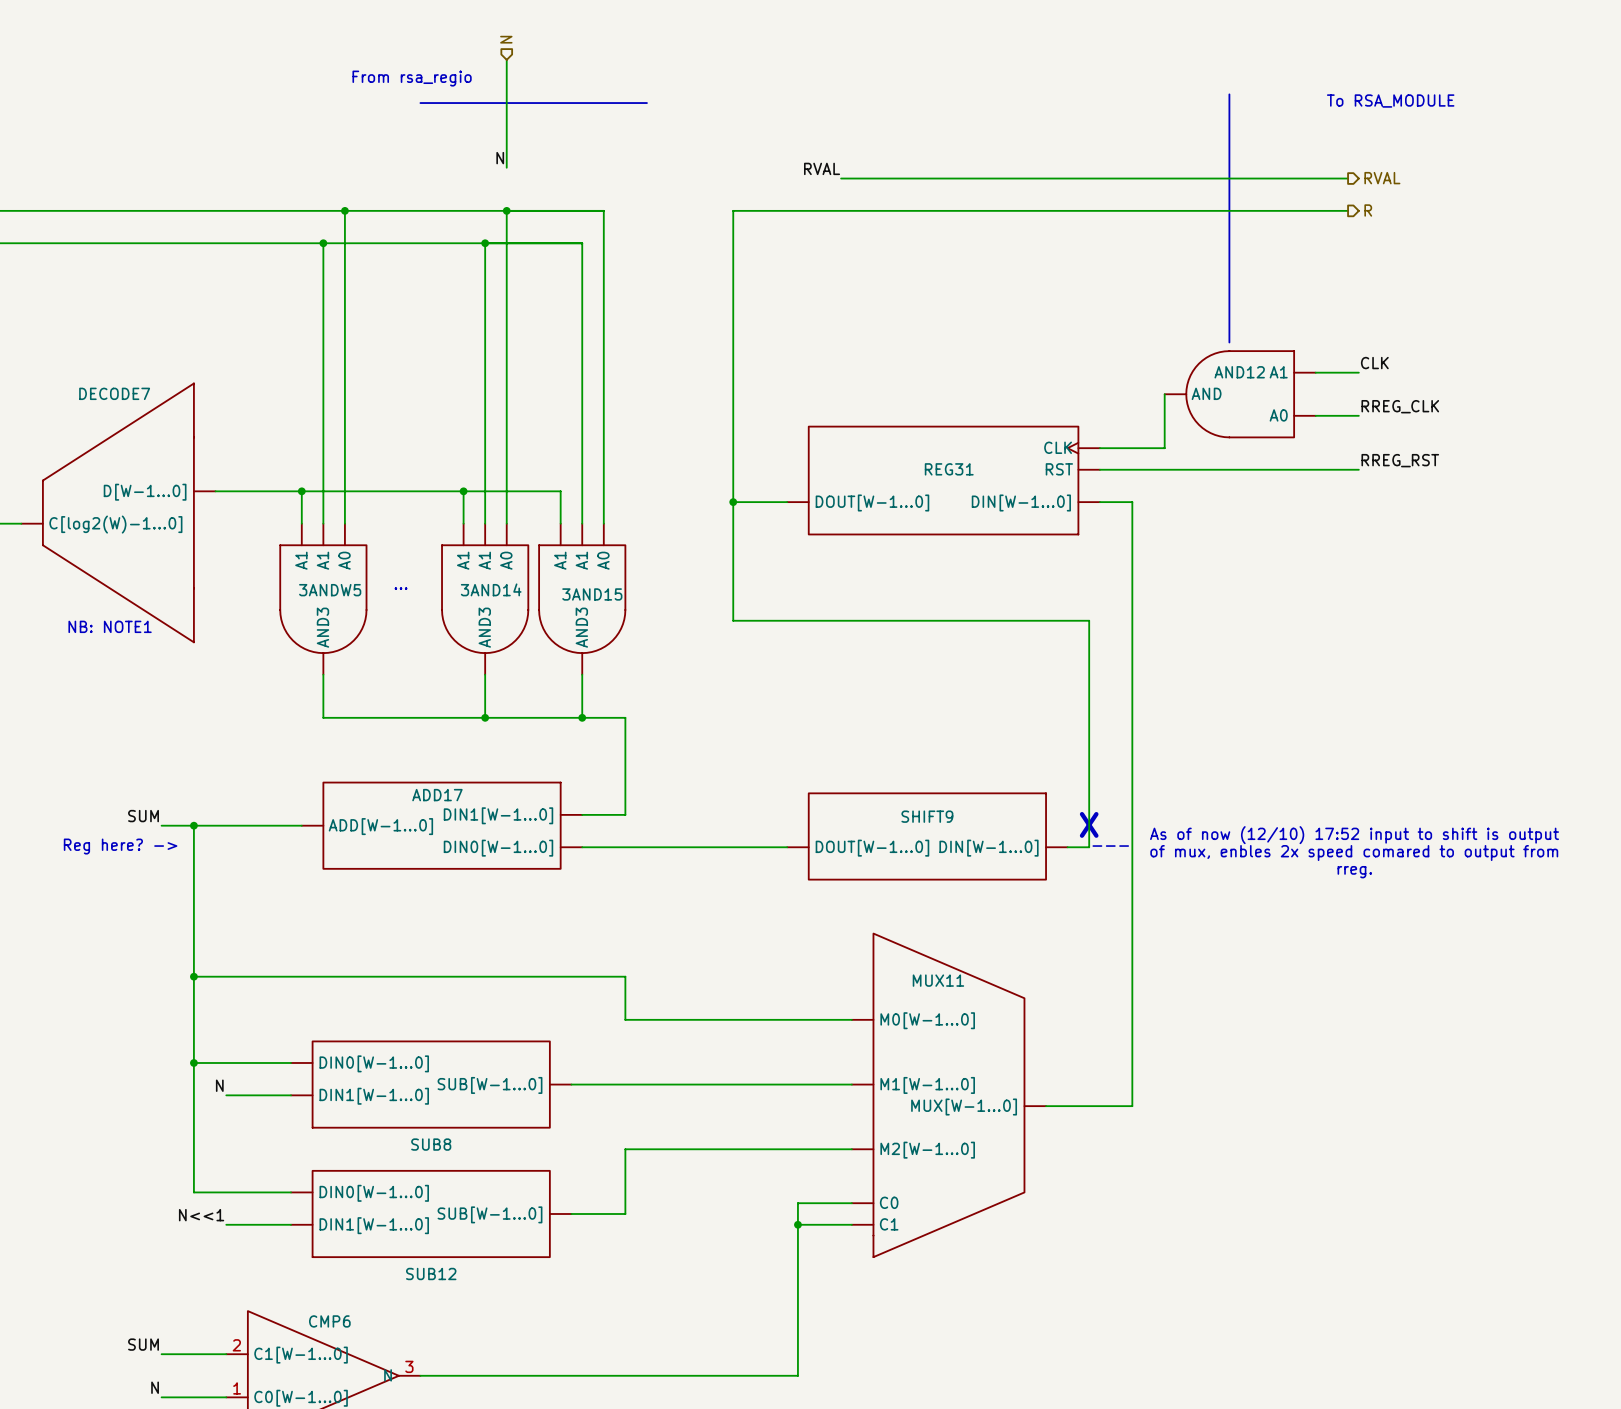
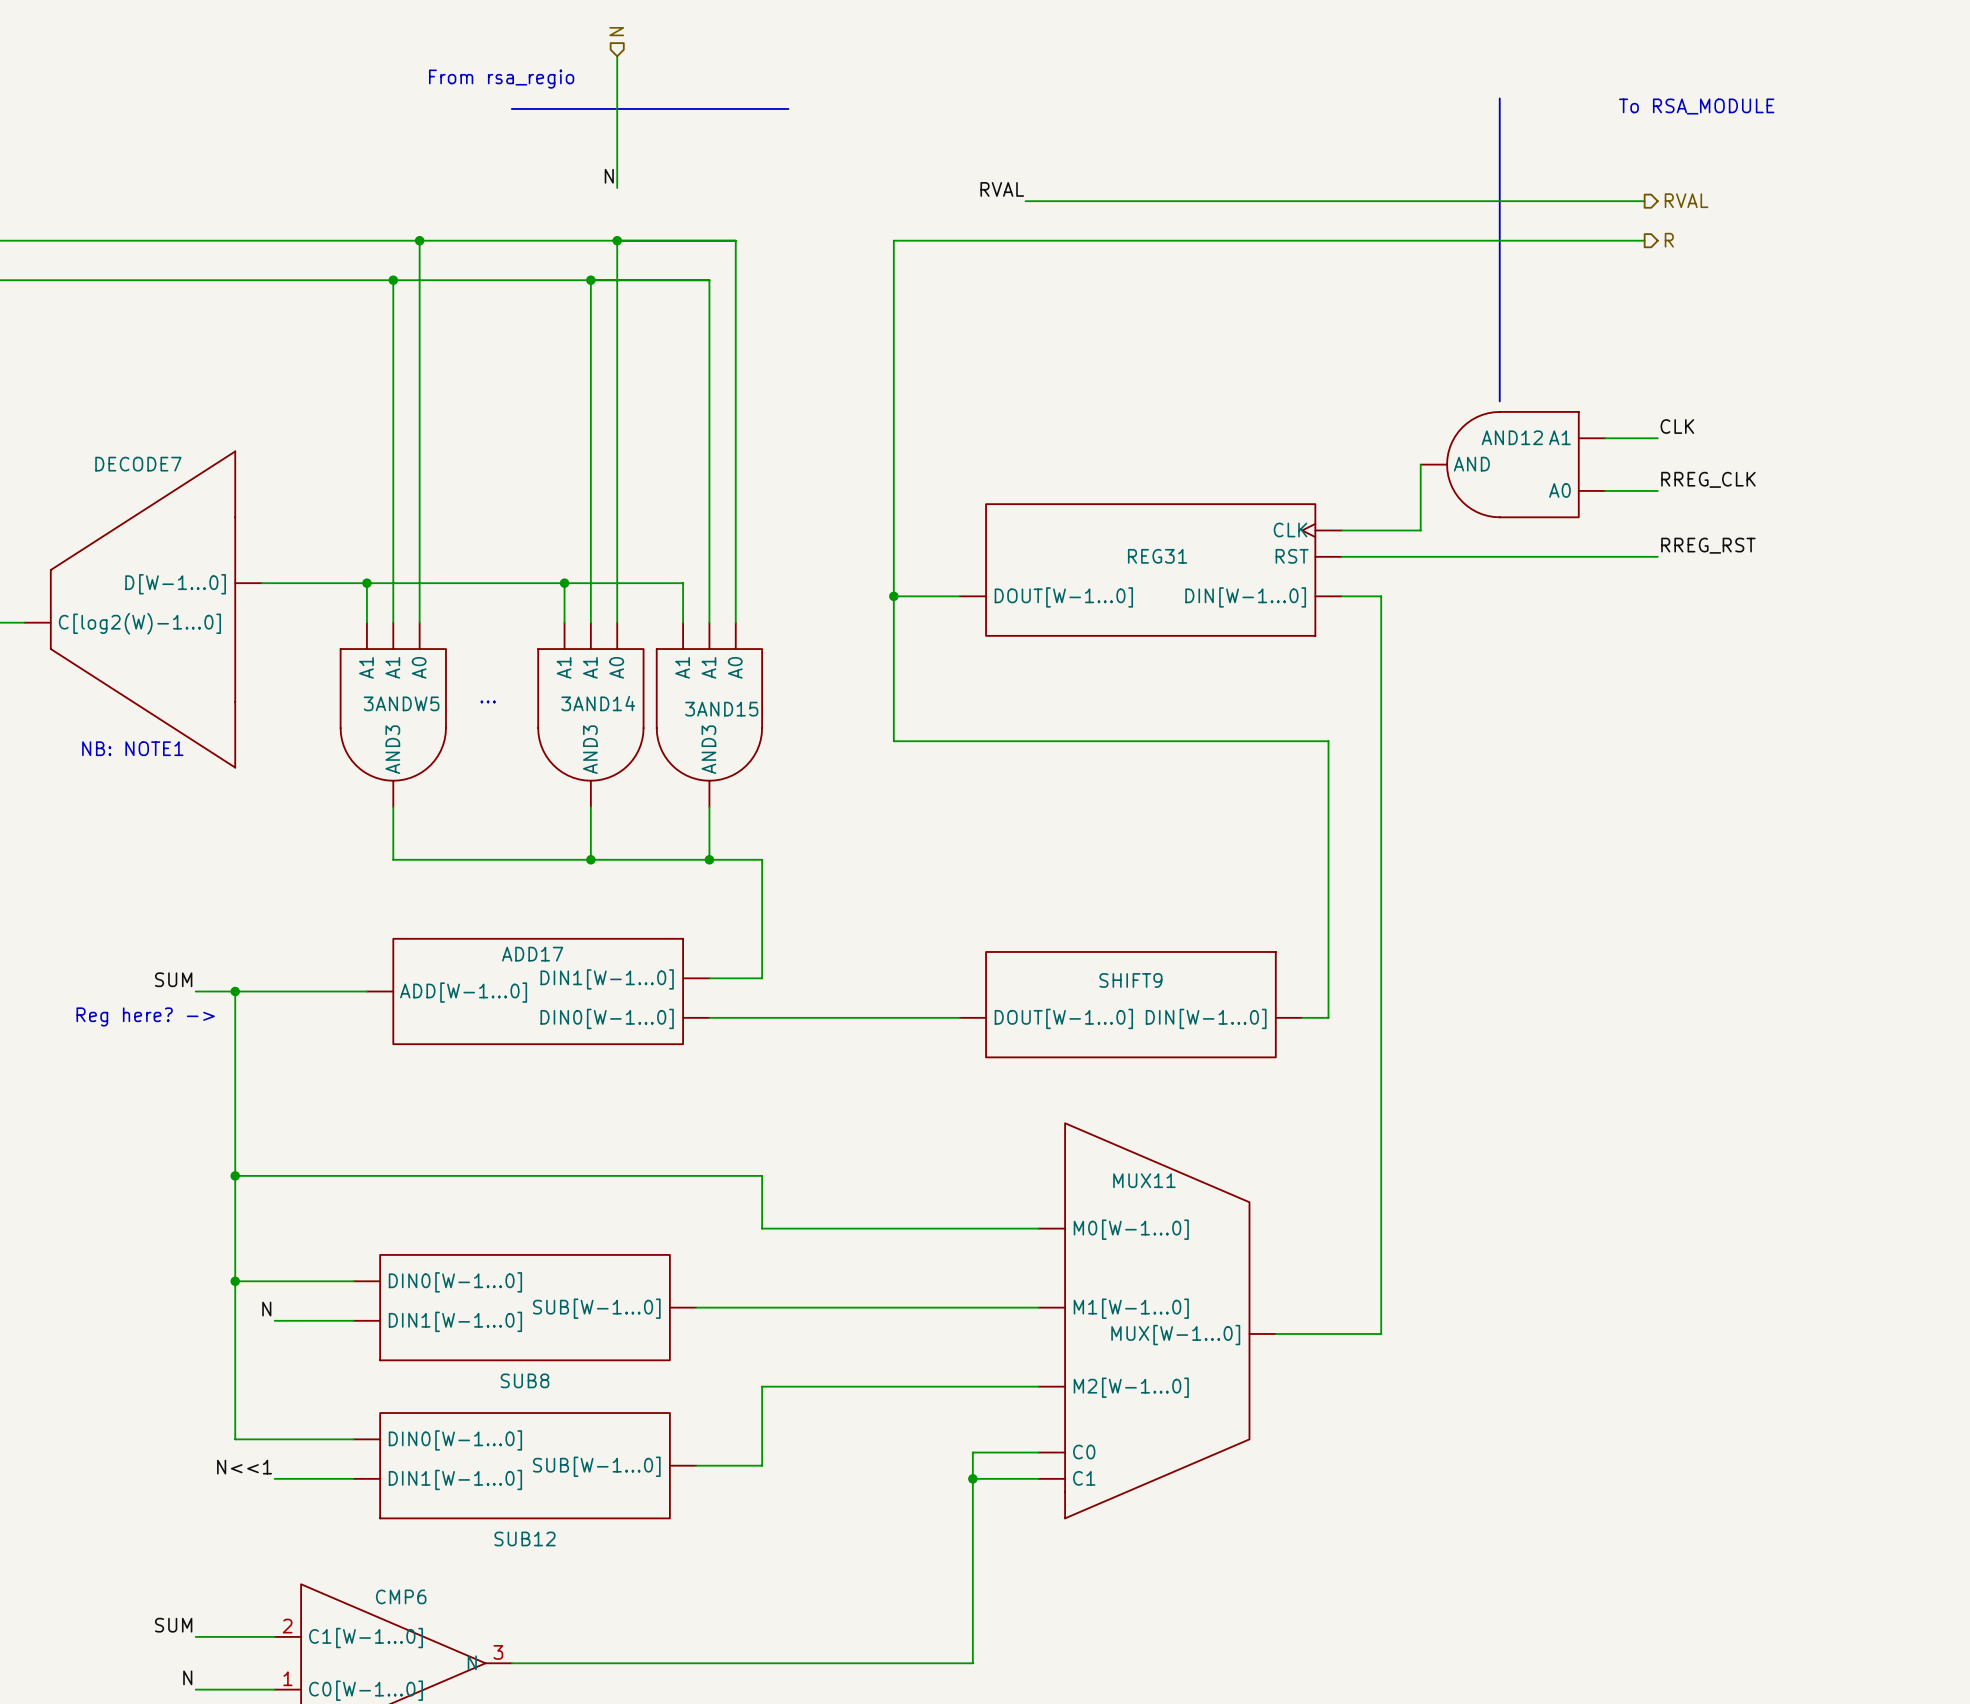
text: X (1089, 824) -> none
text: As of now (12/10) 17:52 input to shift is output (1354, 835) -> none
text: --- (1110, 846) -> none
text: of mux, enbles 2x speed comared to output from (1354, 853) -> none
text: rreg. (1354, 872) -> none

